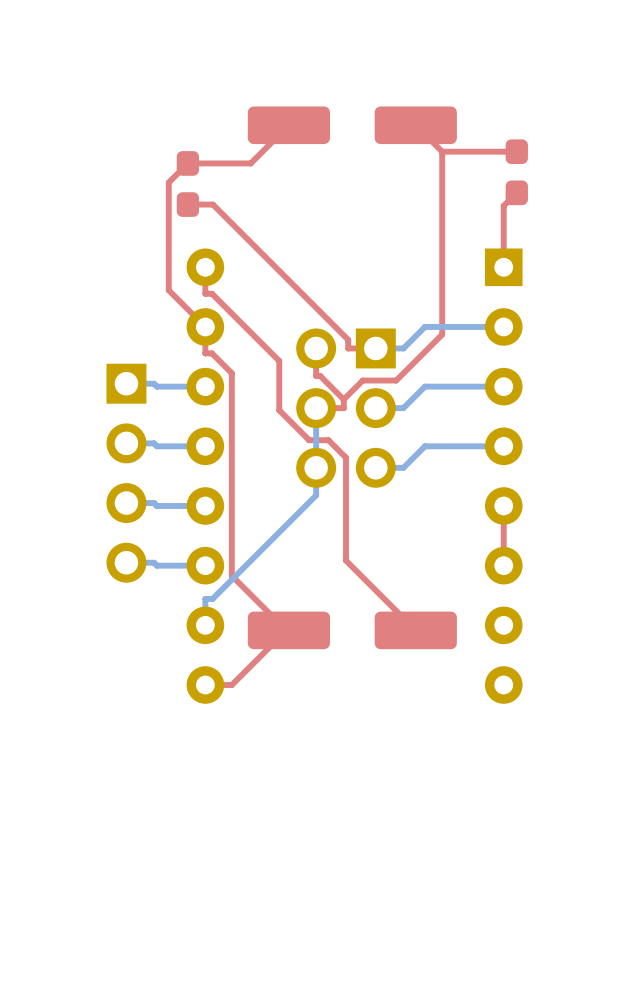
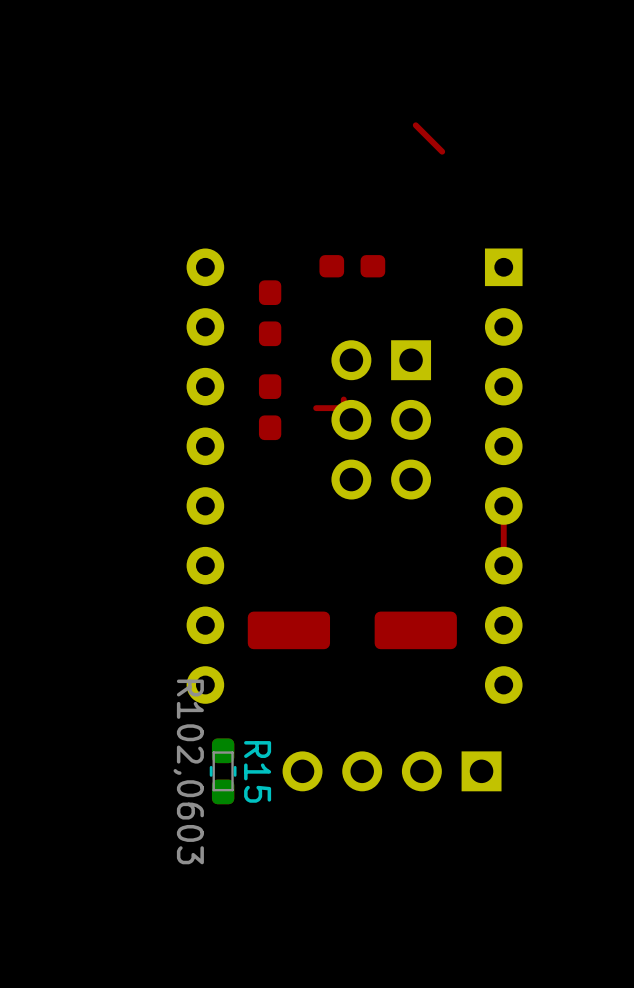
top track: (288, 125) (250, 163) (187, 163) (168, 182) (168, 290) (205, 326) (205, 353) (211, 353) (231, 373) (231, 575) (286, 630) -> none
part: (352, 125) -> none
top track: (516, 151) (442, 151) (442, 334) (396, 380) (362, 380) (343, 399) (320, 376) (316, 376) (316, 348) -> none
part: (516, 172) -> none
part: (187, 184) -> none
top track: (516, 192) (503, 205) (503, 267) -> none
top track: (187, 204) (212, 204) (348, 339) (348, 348) (375, 348) -> none
part: none -> (352, 266)
top track: (205, 267) (205, 293) (211, 293) (279, 361) (279, 410) (309, 440) (328, 440) (345, 457) (345, 560) (415, 630) -> none
part: none -> (270, 313)
bottom track: (503, 326) (424, 326) (403, 348) (375, 348) -> none
bottom track: (126, 383) (154, 383) (156, 386) (205, 386) -> none
bottom track: (503, 386) (424, 386) (403, 408) (375, 408) -> none
part: none -> (270, 407)
bottom track: (316, 408) (316, 495) (212, 598) (205, 598) (205, 625) -> none
part position: (345, 408) -> (381, 419)
bottom track: (126, 443) (154, 443) (156, 446) (205, 446) -> none
bottom track: (503, 446) (424, 446) (403, 467) (375, 467) -> none
part rotation: 0° (126, 473) -> 90° clockwise (392, 771)
part position: (126, 473) -> (392, 771)
bottom track: (126, 503) (154, 503) (156, 505) (205, 505) -> none
bottom track: (126, 562) (154, 562) (156, 565) (205, 565) -> none
top track: (286, 630) (231, 685) (205, 685) -> none
R15: none -> R102,0603 (223, 771)

